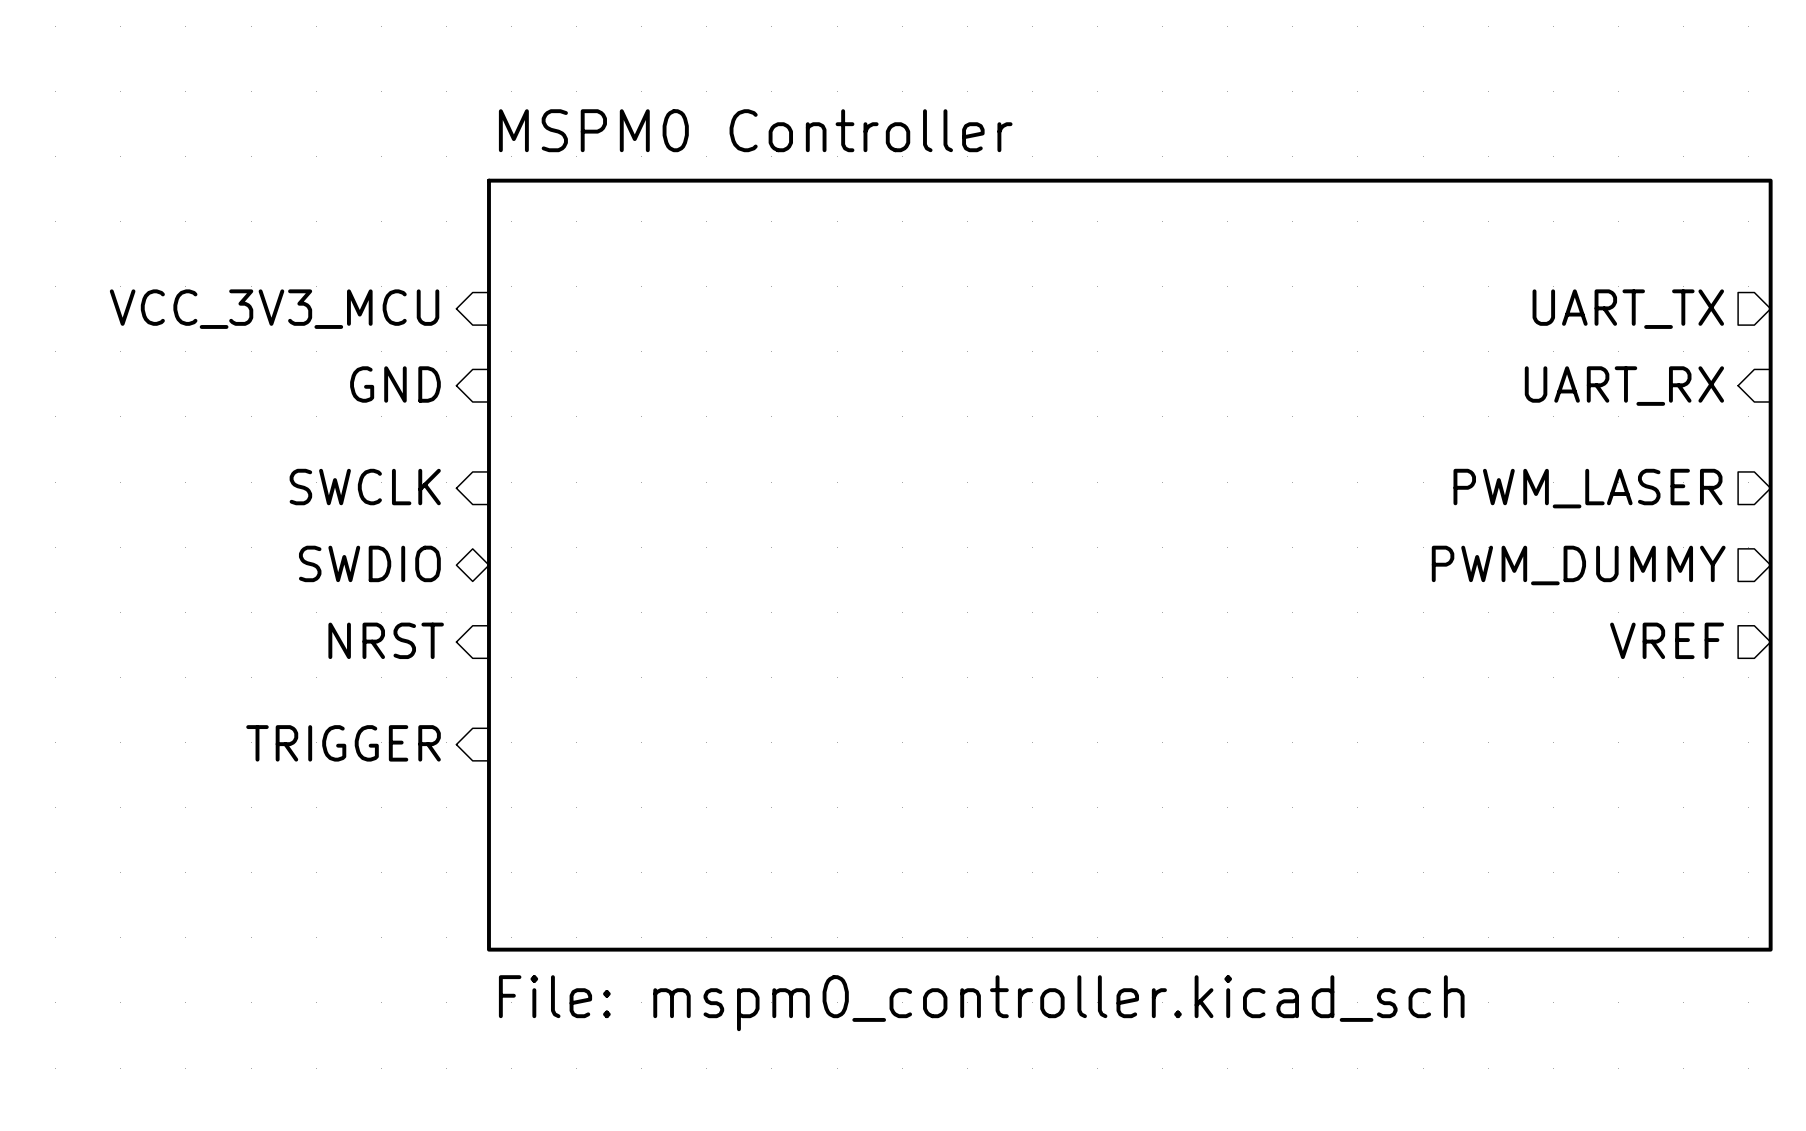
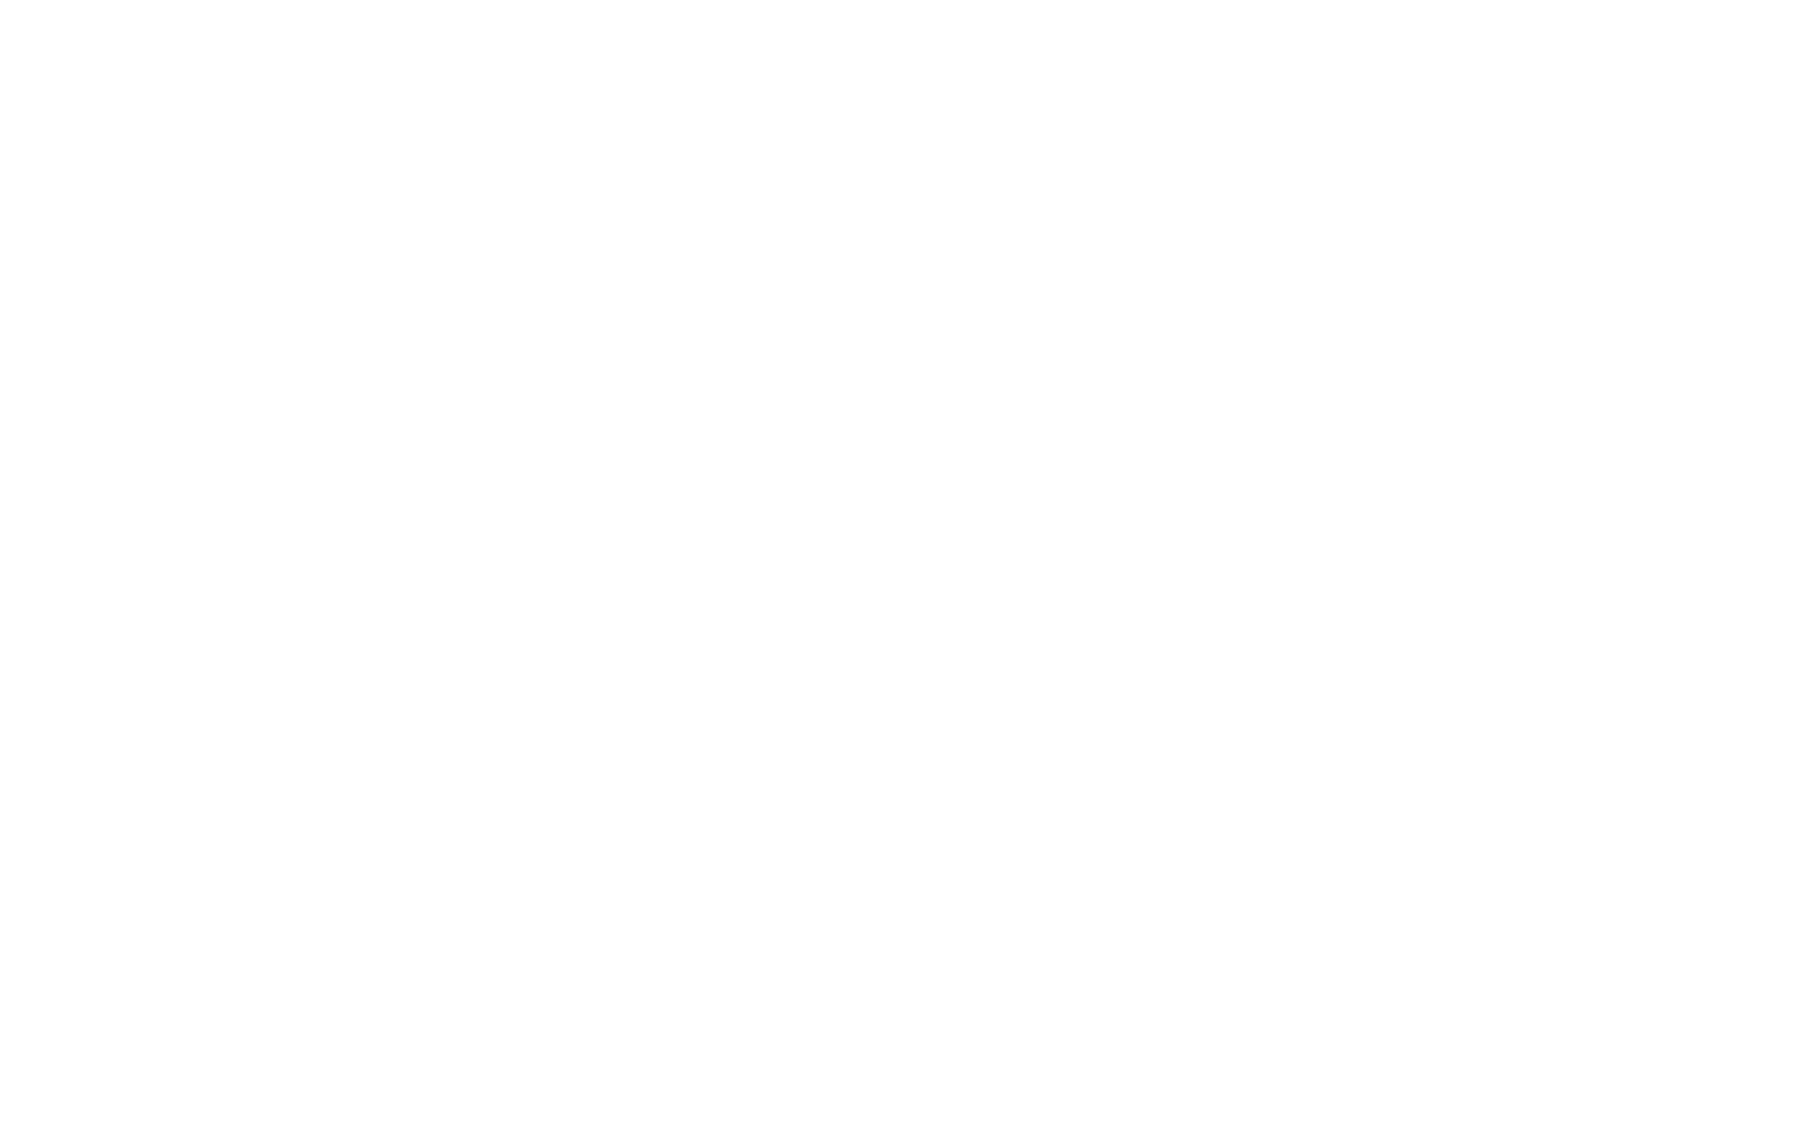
sheet pin: VCC_3V3_MCU (274, 309) -> none
sheet pin: UART_TX (1628, 309) -> none
sheet pin: GND (395, 384) -> none
sheet pin: UART_RX (1624, 386) -> none
sheet pin: SWCLK (365, 487) -> none
sheet pin: PWM_LASER (1587, 488) -> none
sheet pin: SWDIO (369, 563) -> none
sheet MSPM0 Controller: File: mspm0_controller.kicad_sch (1129, 565) -> none
sheet pin: PWM_DUMMY (1578, 565) -> none
sheet pin: NRST (386, 640) -> none
sheet pin: VREF (1667, 640) -> none
sheet pin: TRIGGER (343, 743) -> none

